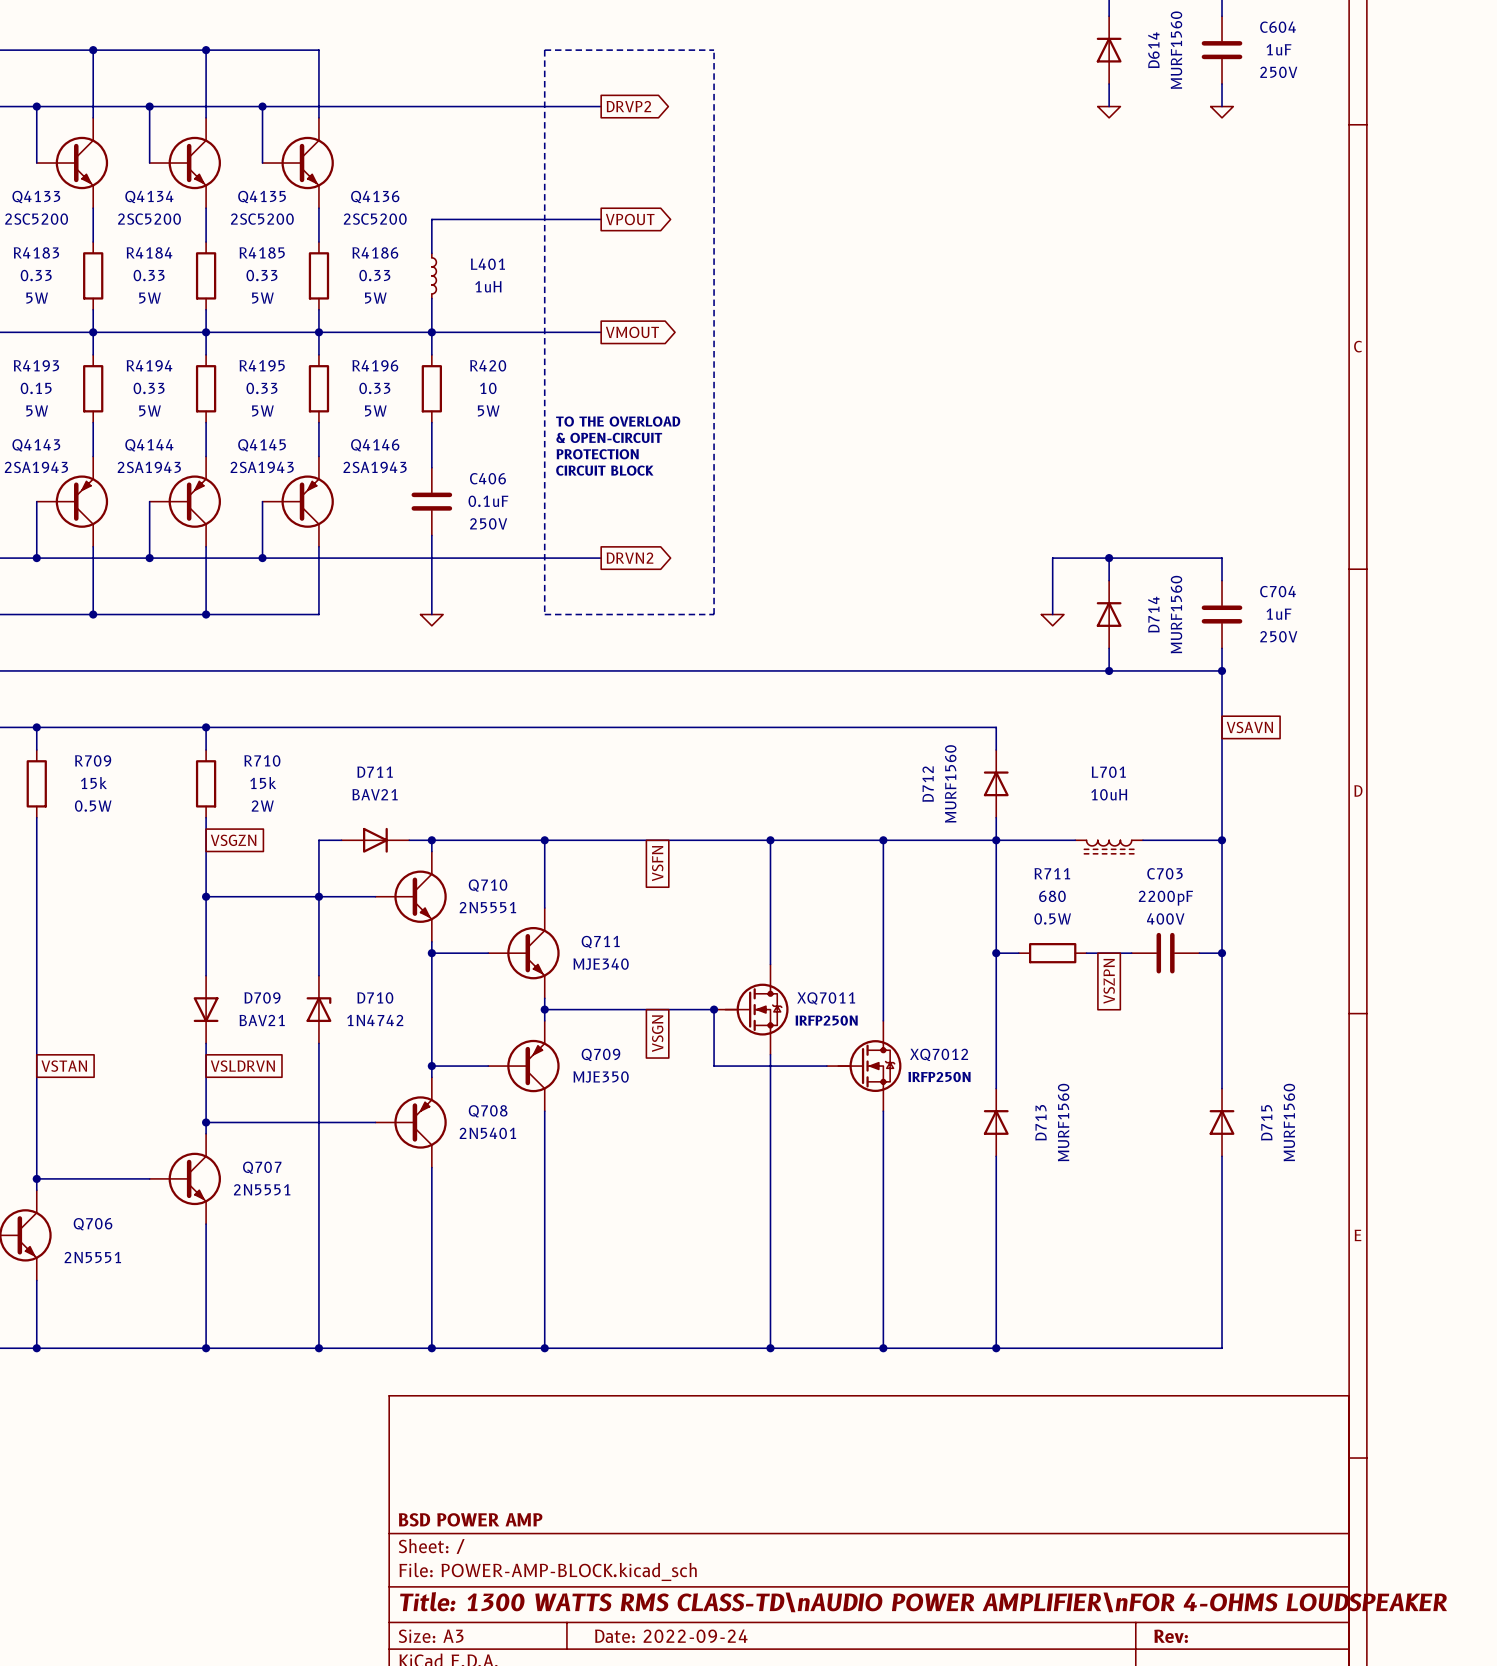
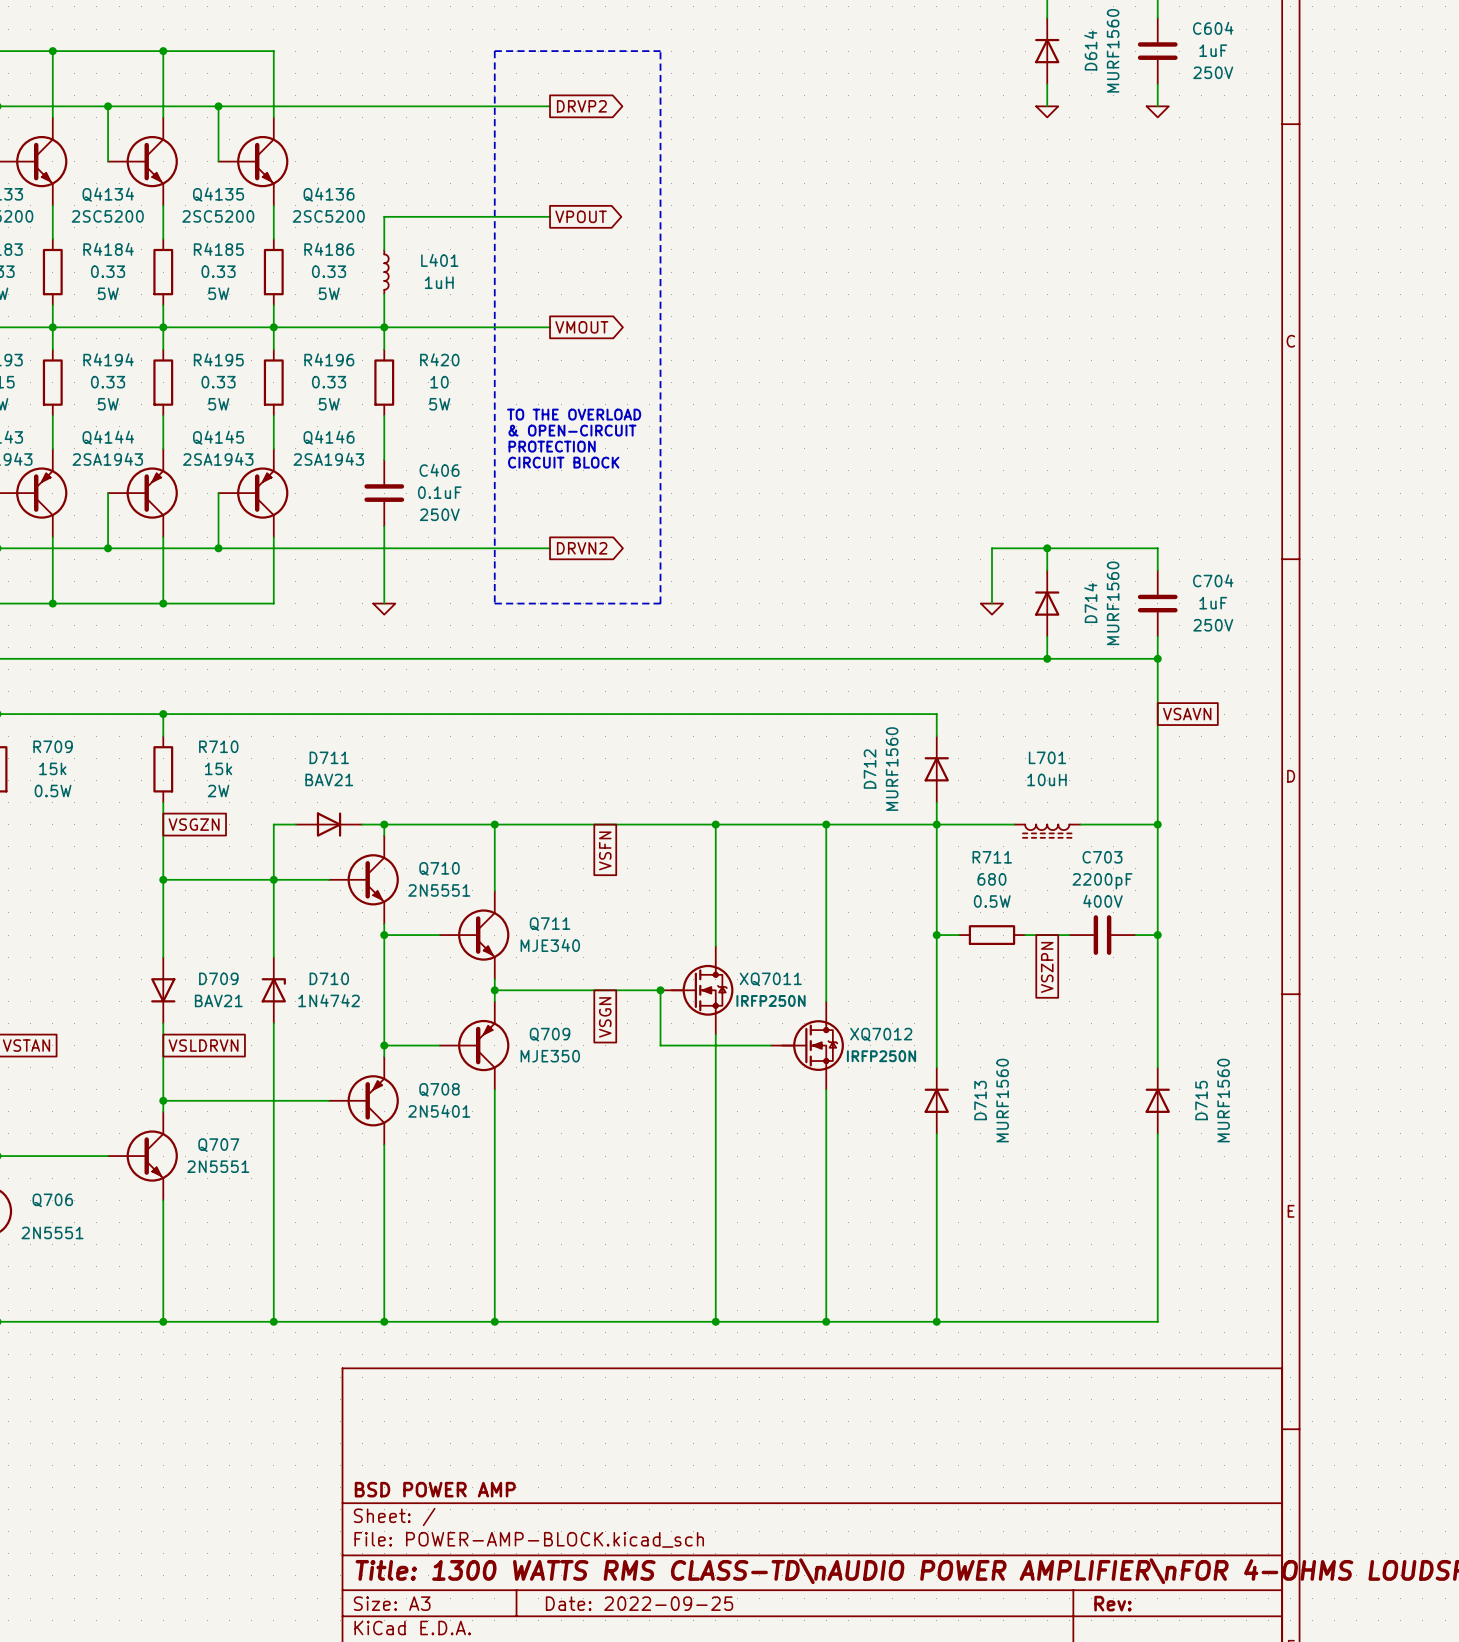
title block: Date: 2022-09-24 (671, 1636) -> Date: 2022-09-25 (639, 1603)

